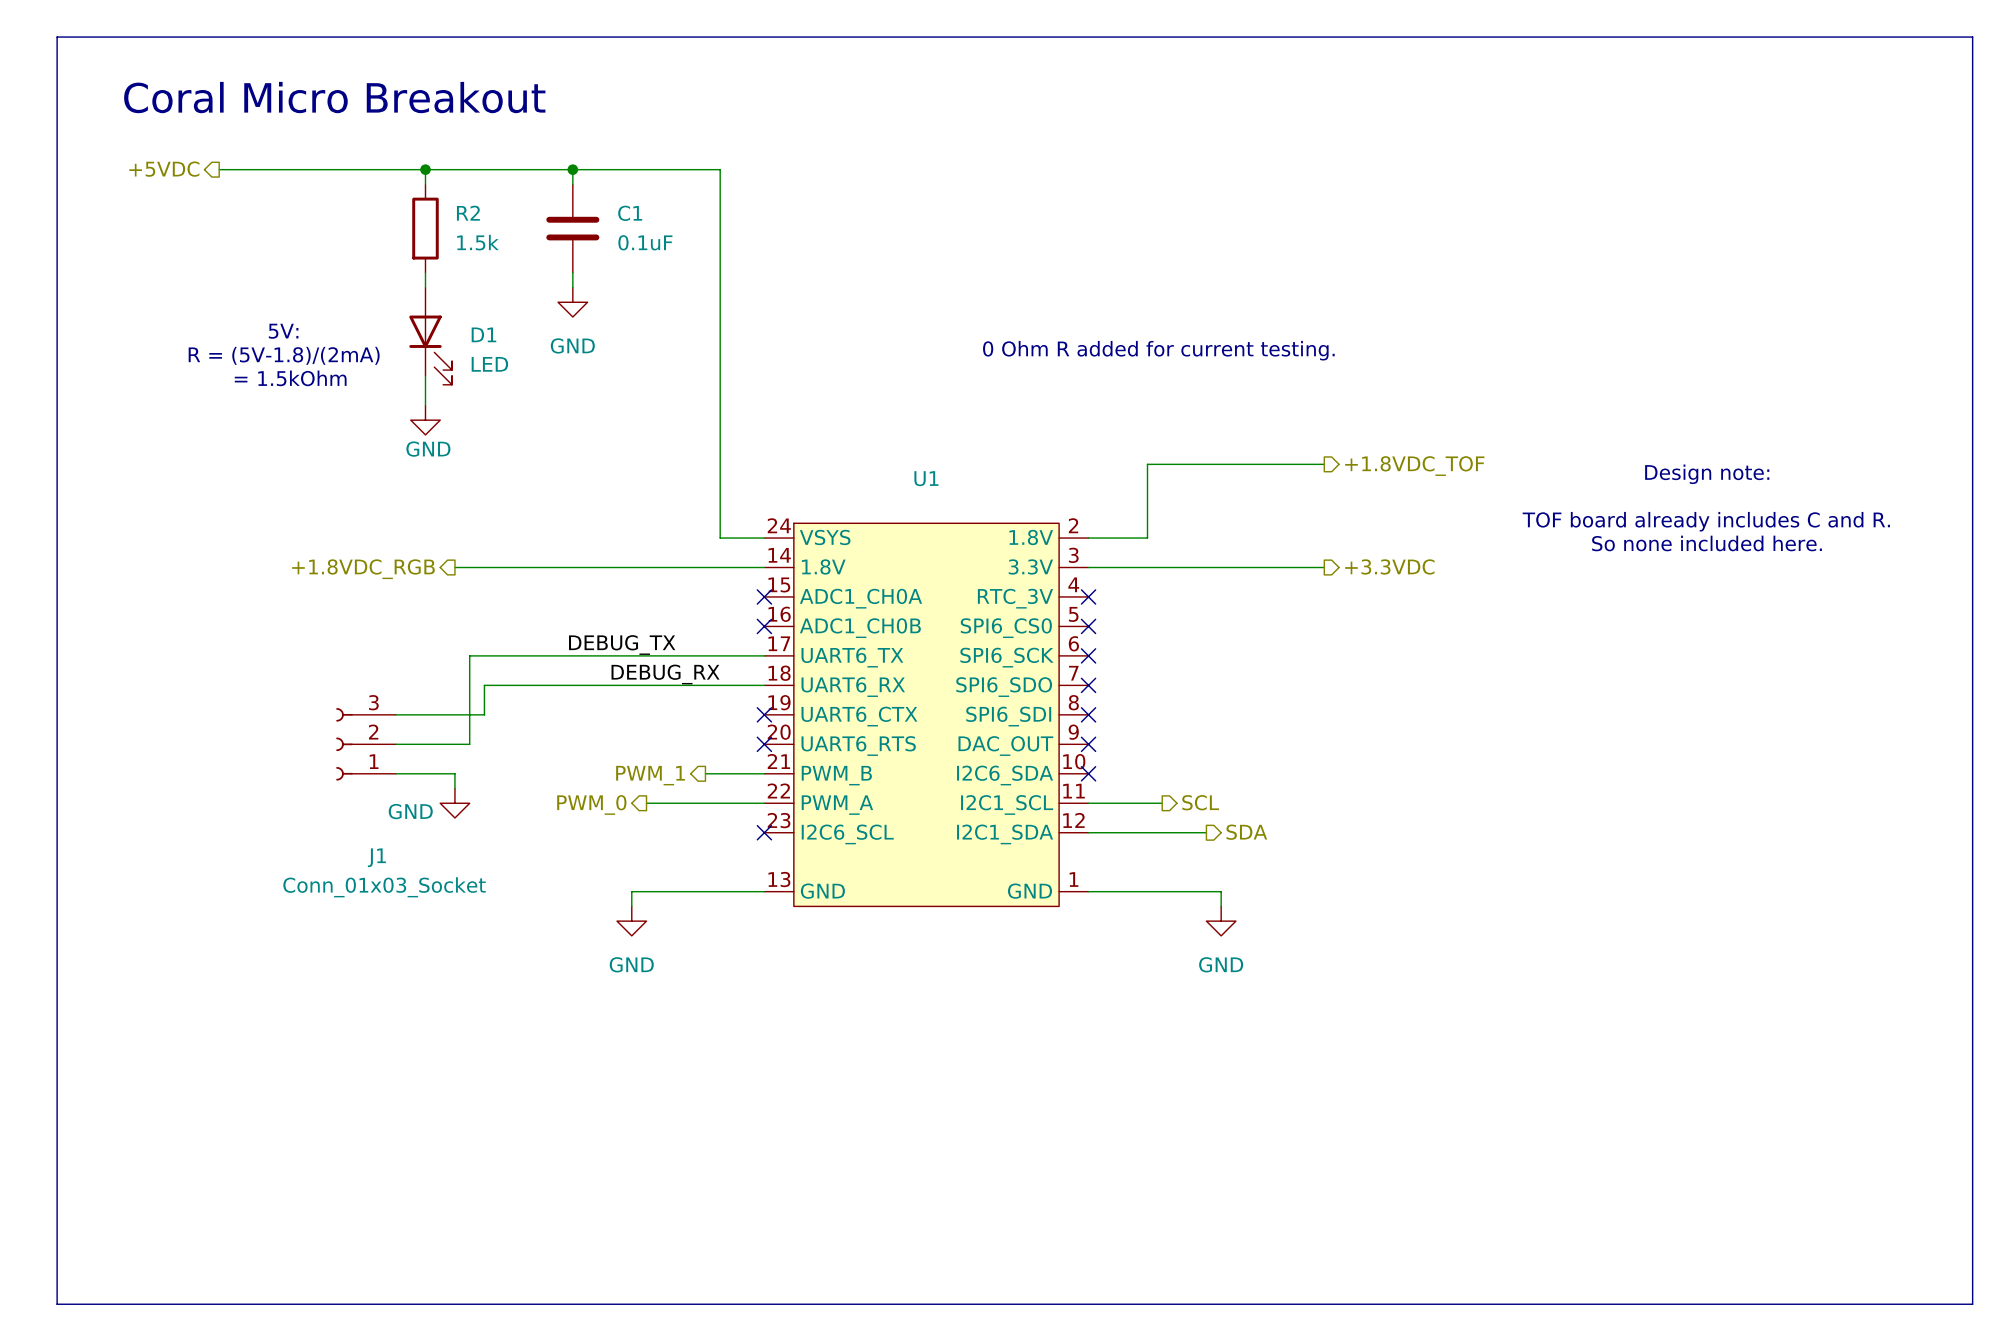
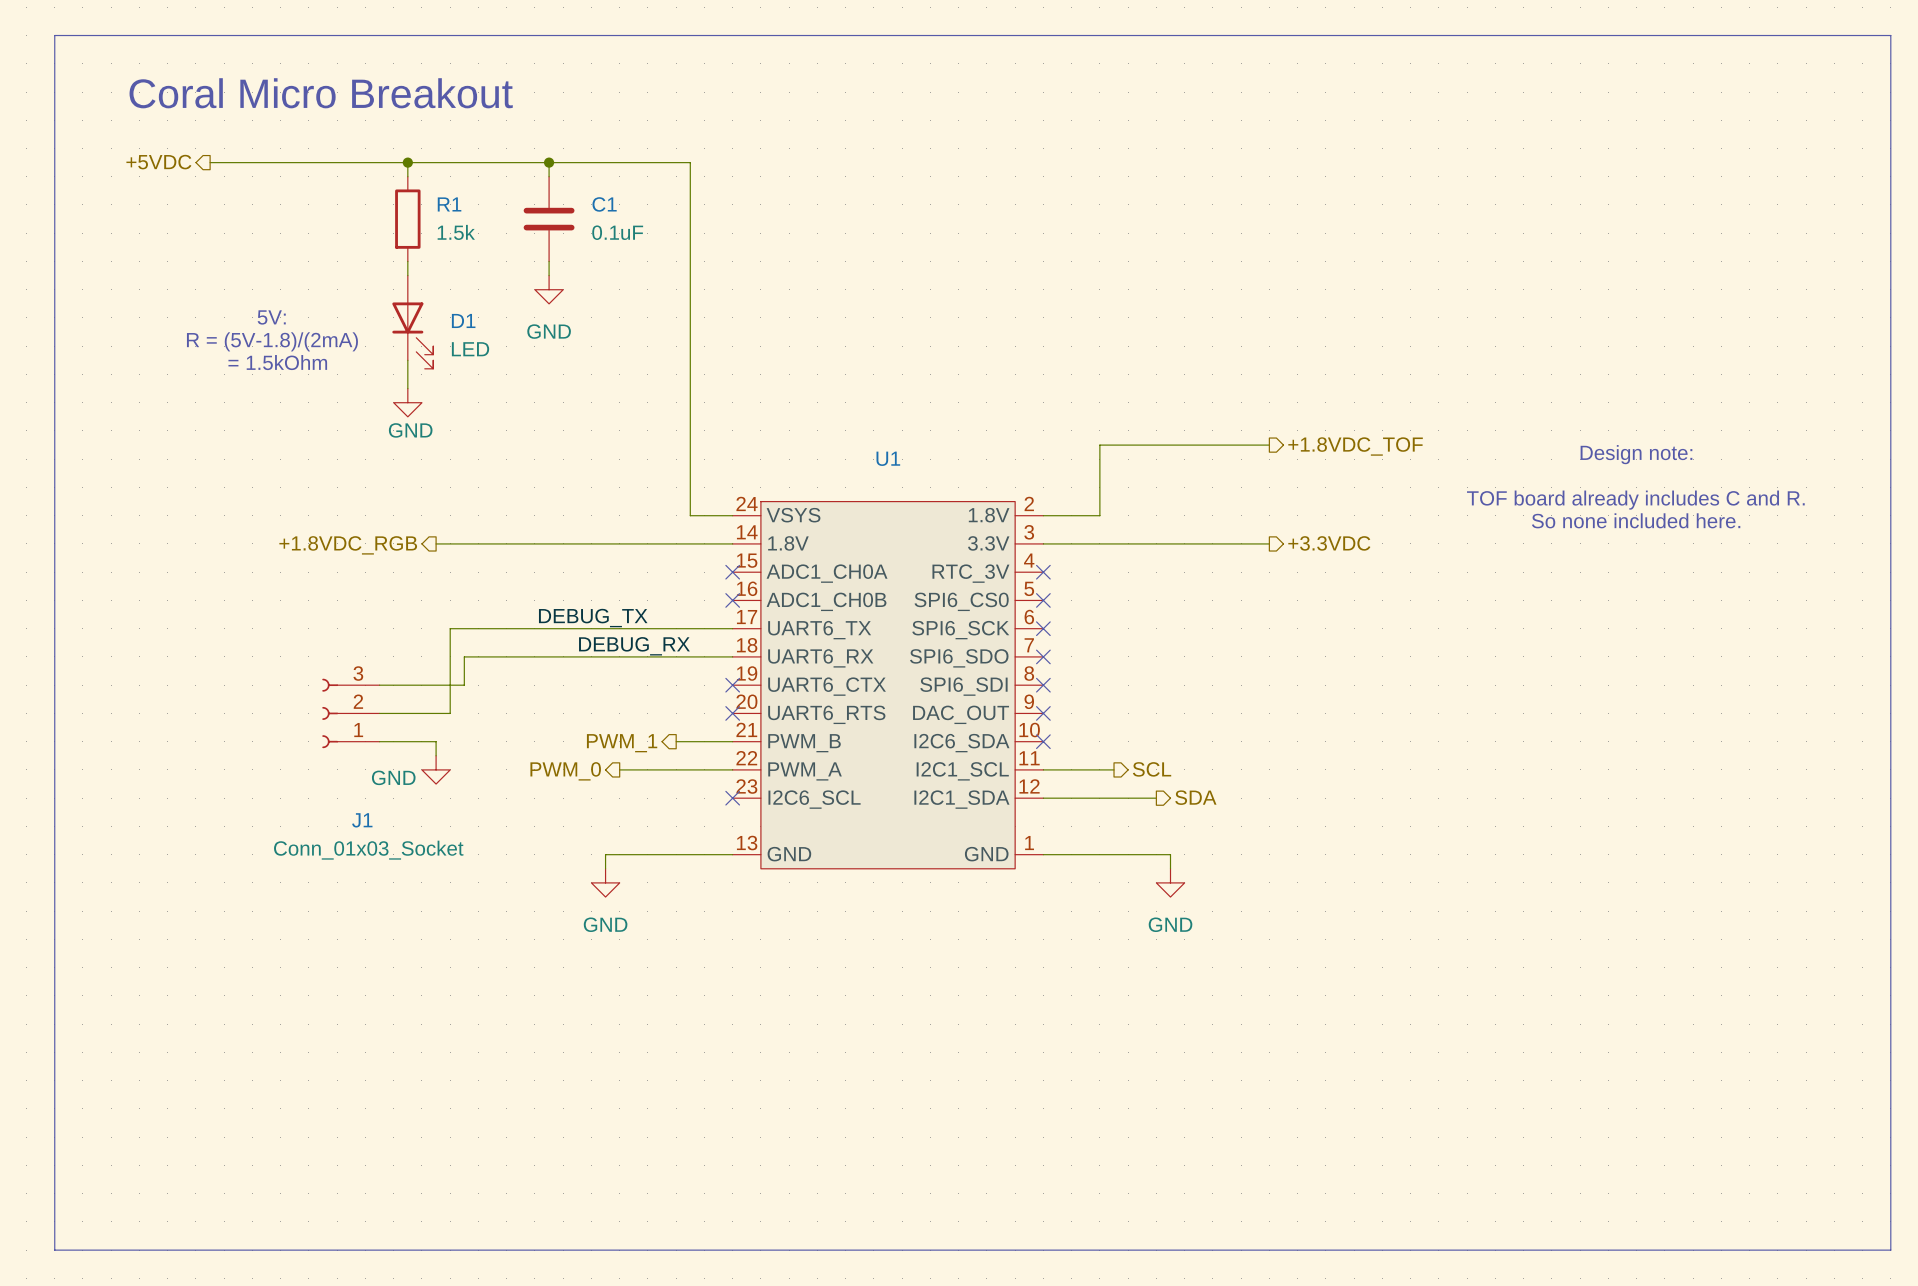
R2 name: R2 (468, 213) -> R1 (449, 204)
text: 0 Ohm R added for current testing. (1158, 350) -> none

